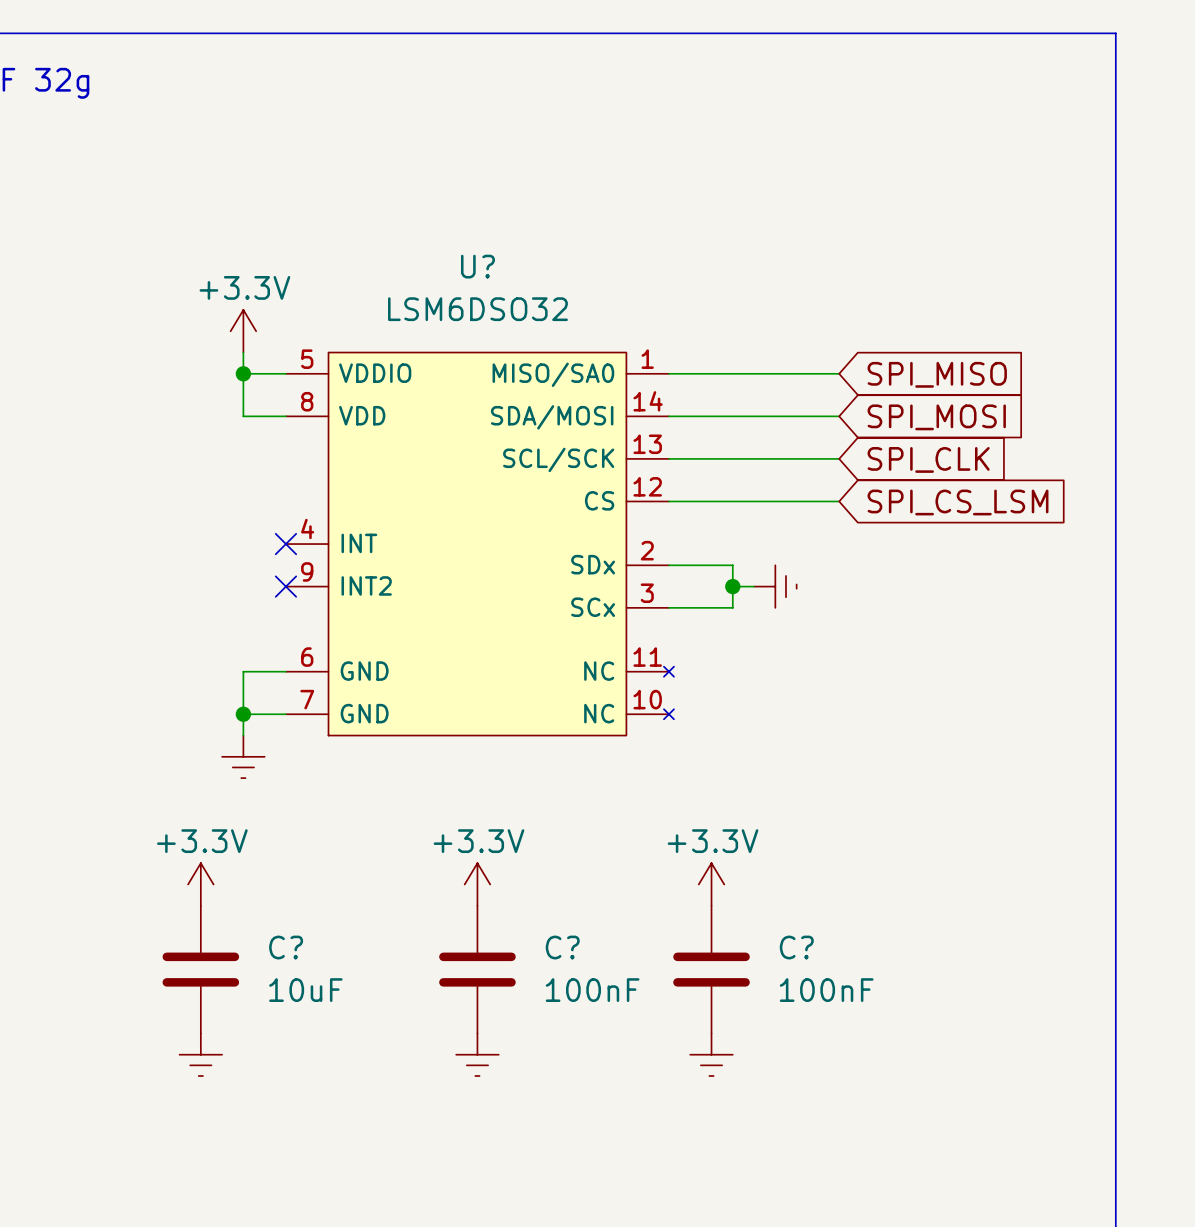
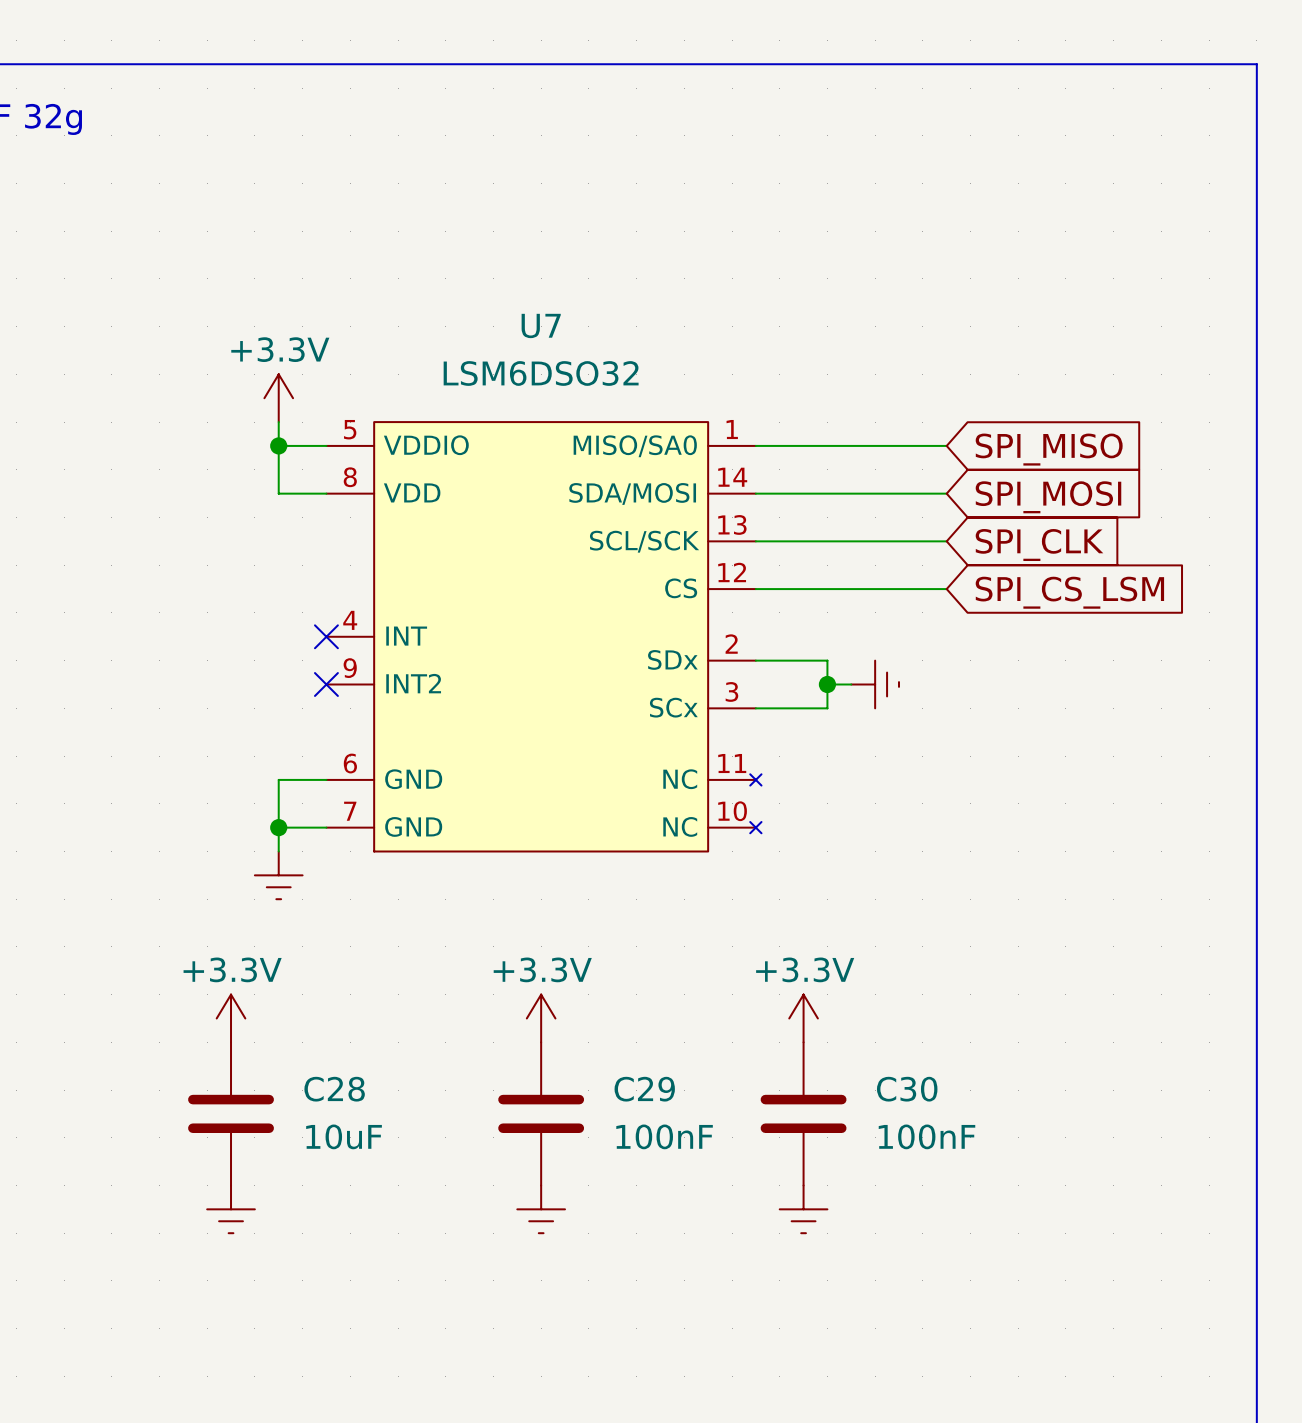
U? name: U? (477, 266) -> U7 (541, 325)
C? name: C? (286, 947) -> C28 (334, 1089)
C? name: C? (562, 947) -> C29 (644, 1089)
C? name: C? (796, 947) -> C30 (907, 1089)

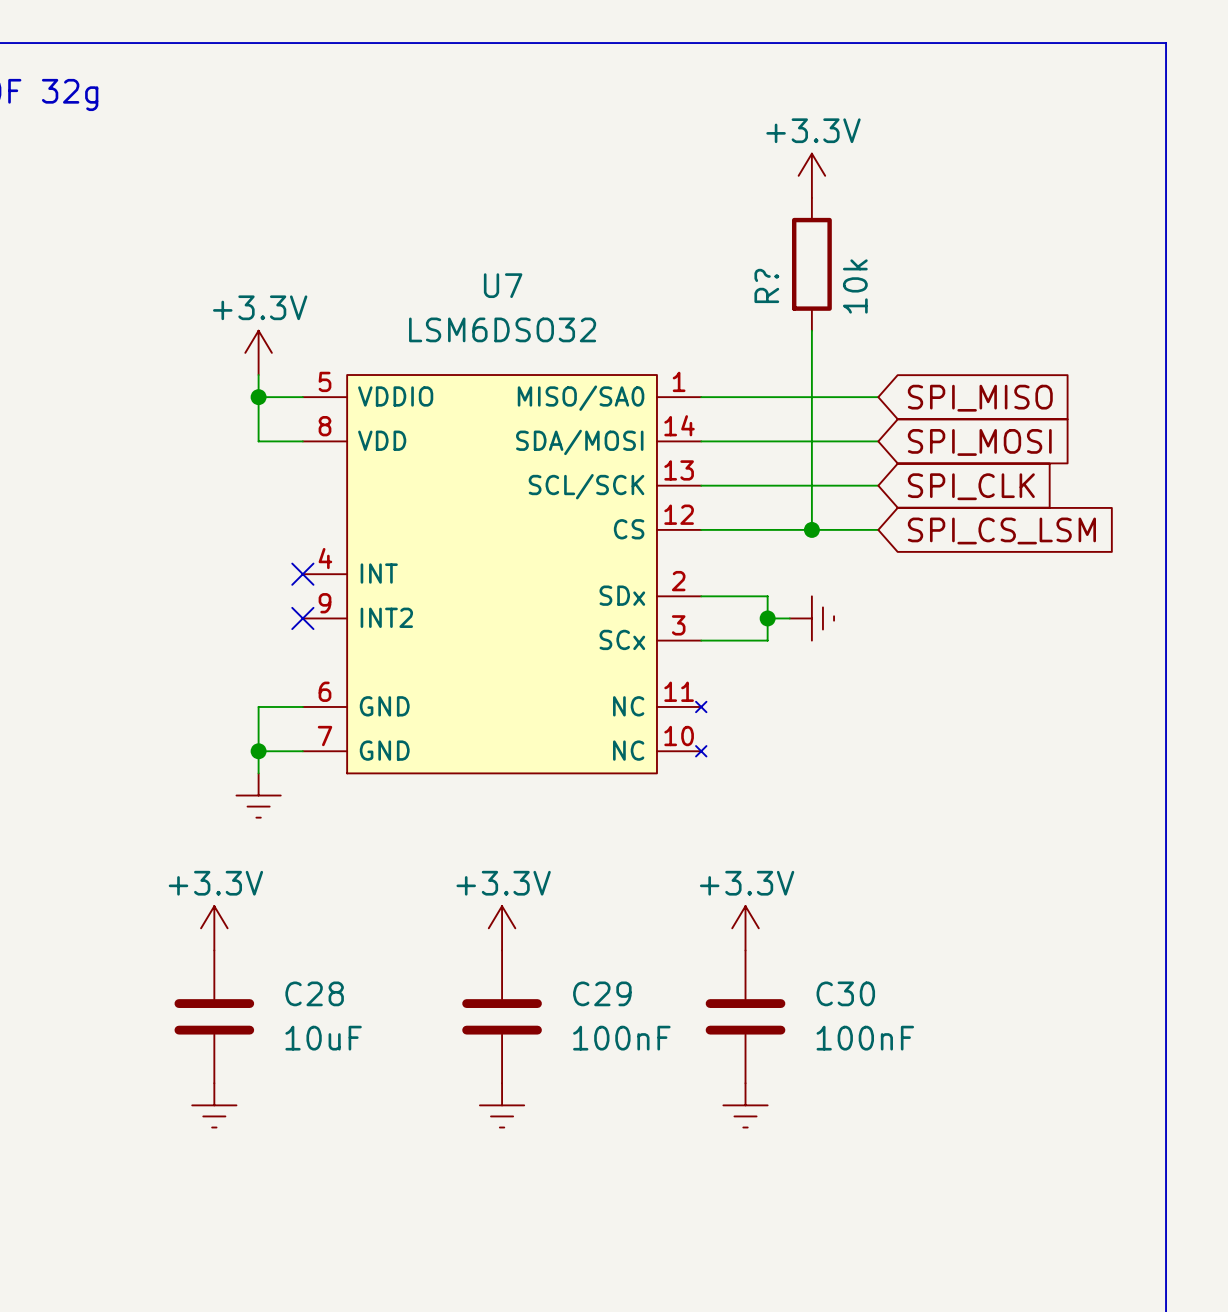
power symbol: none -> +3.3V (811, 175)
R?: none -> 10k (811, 264)
wire: none -> (811, 330) (811, 529)
junction: none -> (811, 529)

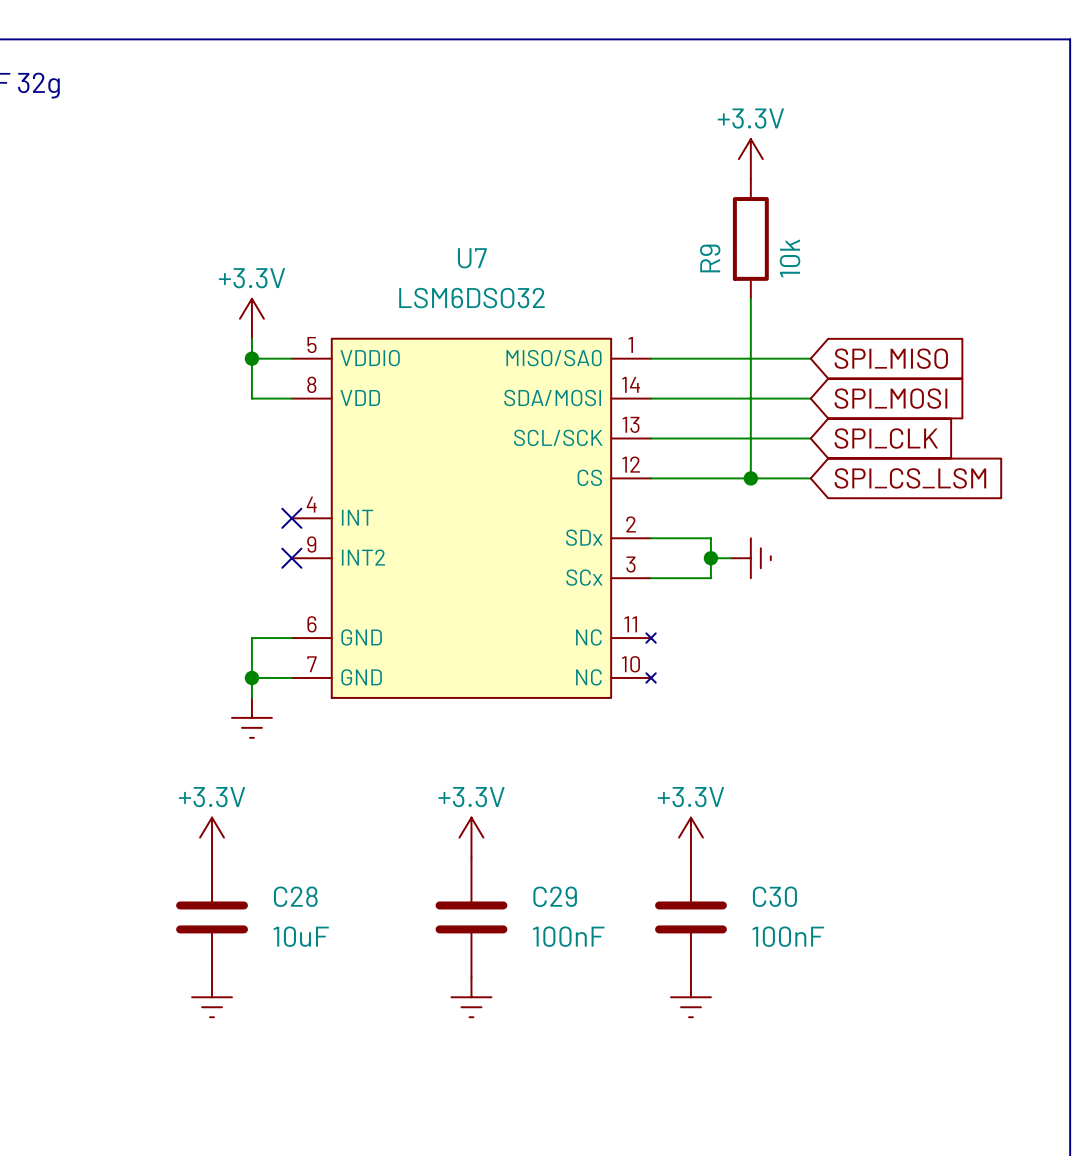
R? name: R? (766, 285) -> R9 (710, 258)

